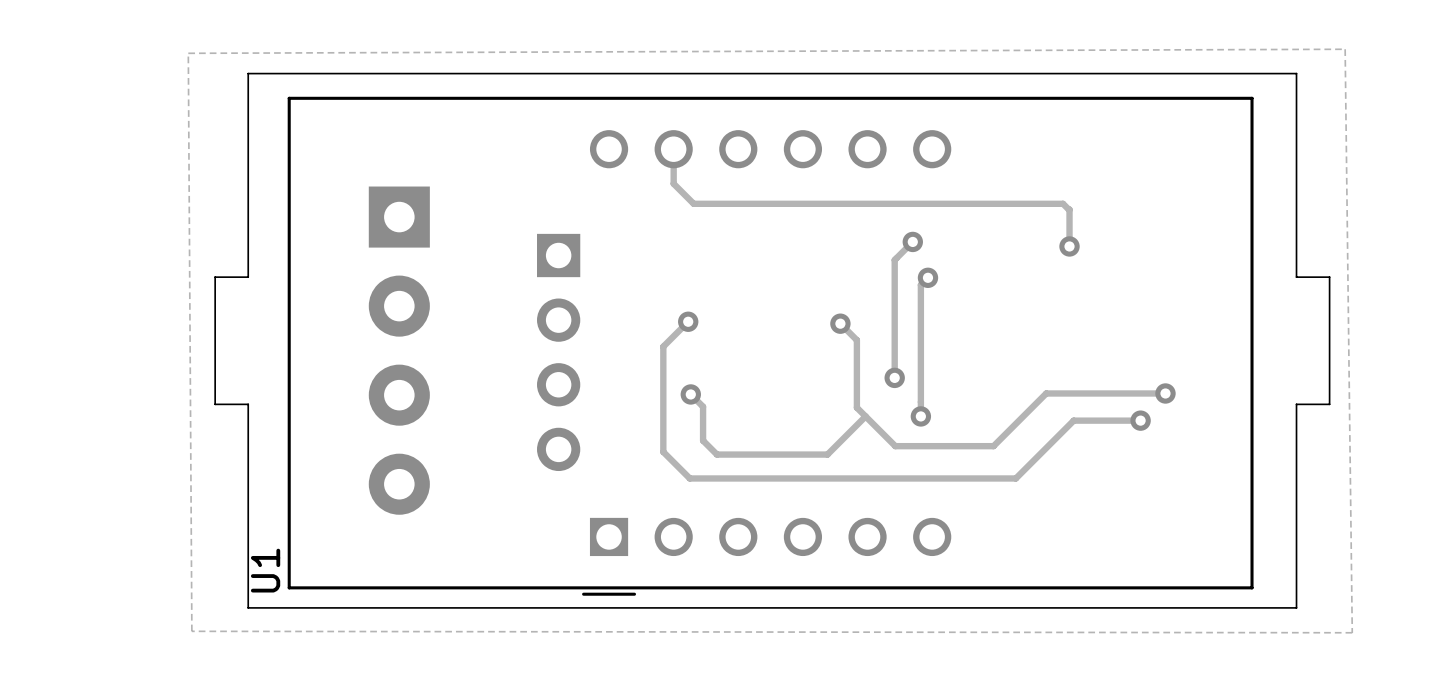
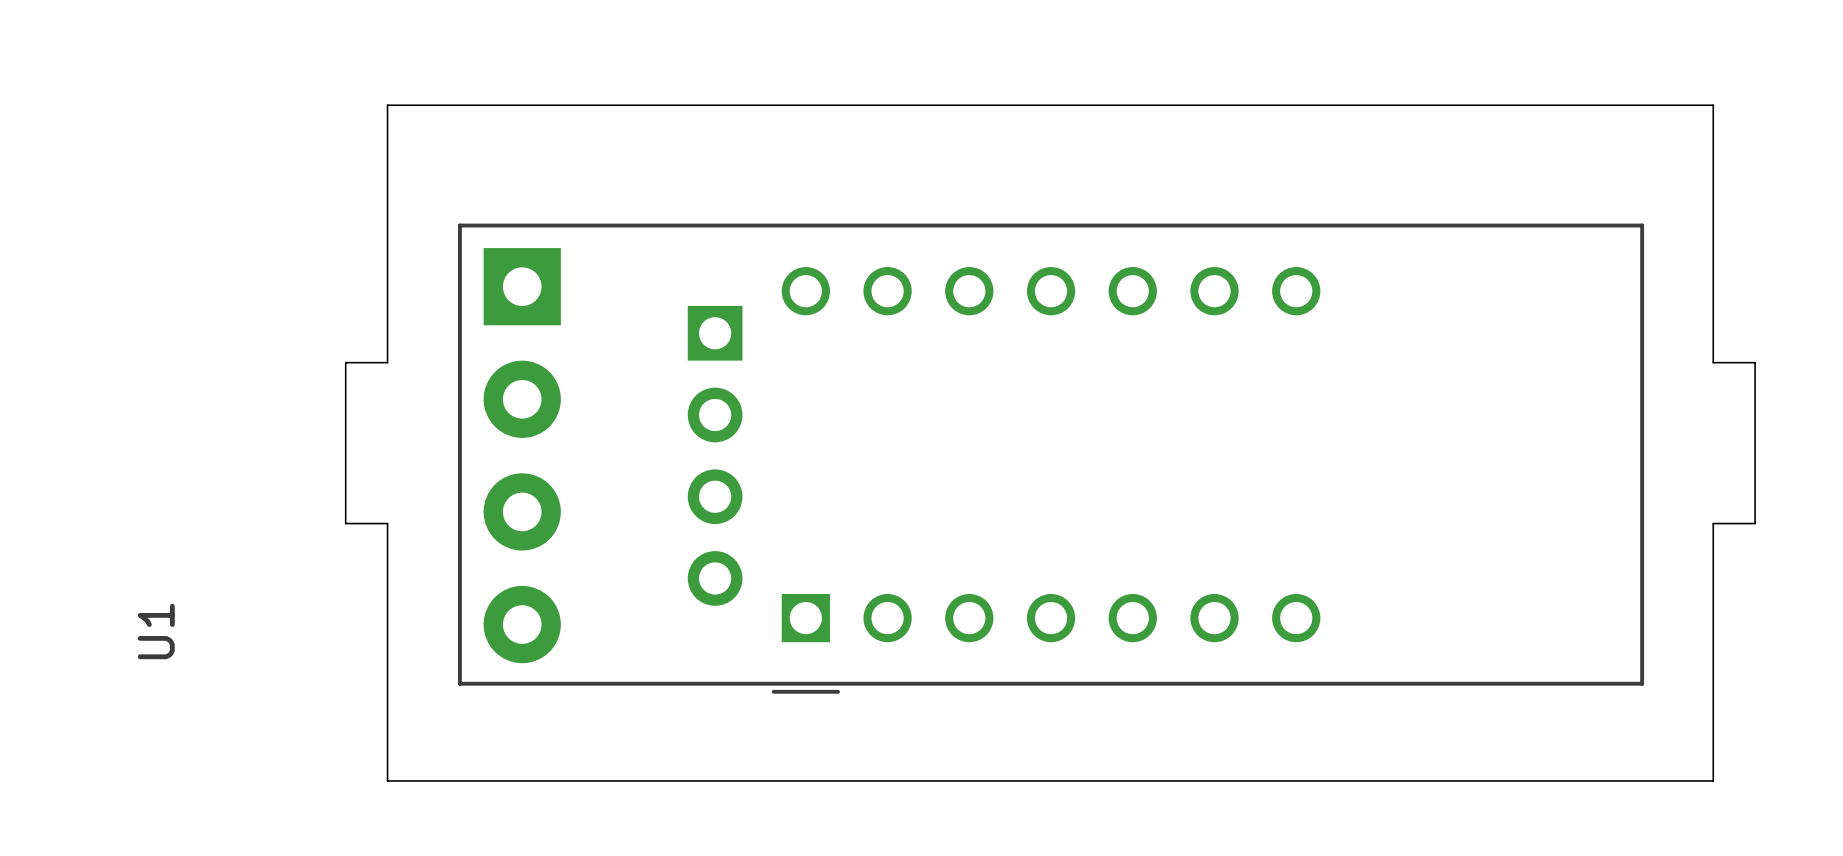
zone outline: (1345, 49) (1352, 632) (191, 631) (188, 53) (1345, 49) -> none
U1 footprint: [287, 96, 1254, 596] -> [458, 223, 1645, 694]
track: (673, 149) (673, 183) (693, 203) (1063, 203) (1069, 209) (1069, 246) -> none
track: (912, 241) (894, 260) (894, 377) -> none
via: (912, 241) -> none
via: (1069, 246) -> none
track: (927, 277) (920, 284) (920, 416) -> none
via: (927, 277) -> none
track: (688, 321) (663, 346) (663, 451) (689, 478) (1015, 478) (1073, 420) (1140, 420) -> none
via: (688, 321) -> none
track: (840, 323) (856, 340) (856, 407) (895, 446) (993, 446) (1046, 393) (1165, 393) -> none
via: (840, 323) -> none
part position: (399, 350) -> (522, 455)
part position: (558, 352) -> (715, 455)
via: (894, 377) -> none
via: (1165, 393) -> none
track: (690, 394) (703, 406) (703, 440) (716, 454) (827, 454) (865, 416) -> none
via: (690, 394) -> none
via: (920, 416) -> none
via: (1140, 420) -> none
U1 name position: U1 (265, 570) -> U1 (156, 631)

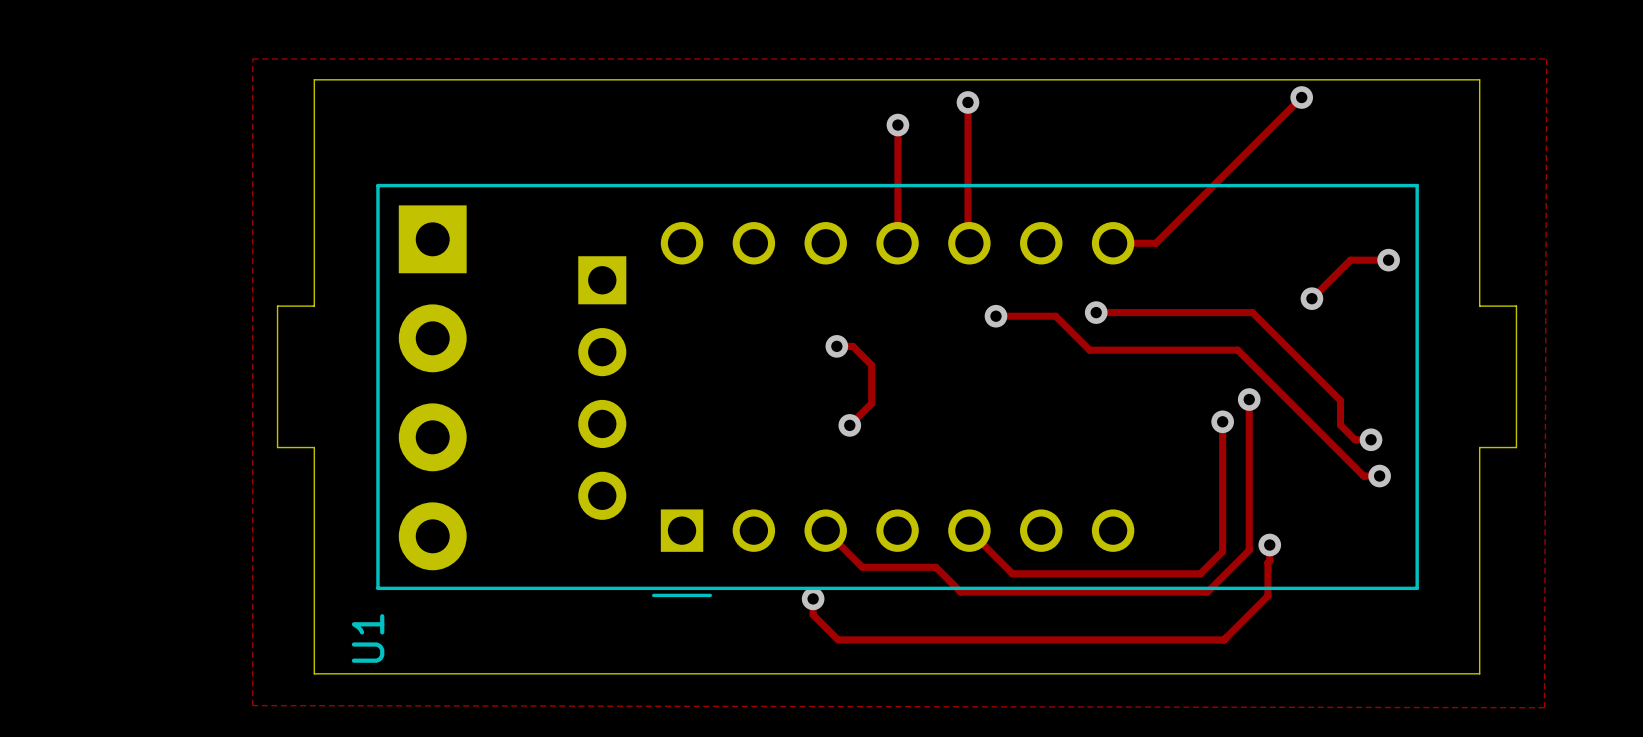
zone outline: none -> (252, 58) (252, 705) (1544, 707) (1546, 58) (252, 58)
track: none -> (1301, 97) (1155, 243) (1113, 243)
via: none -> (1301, 97)
track: none -> (967, 102) (969, 243)
via: none -> (967, 102)
track: none -> (897, 125) (897, 242)
via: none -> (897, 125)
track: none -> (1388, 260) (1350, 260) (1311, 298)
via: none -> (1388, 260)
via: none -> (1311, 298)
track: none -> (1096, 312) (1252, 312) (1340, 400) (1340, 425) (1355, 439) (1371, 439)
via: none -> (1096, 312)
track: none -> (995, 316) (1055, 316) (1089, 350) (1237, 350) (1363, 476) (1379, 476)
via: none -> (995, 316)
track: none -> (836, 346) (852, 346) (871, 365) (871, 403) (849, 425)
via: none -> (836, 346)
track: none -> (1249, 399) (1249, 550) (1207, 592) (960, 592) (936, 567) (862, 567) (825, 530)
via: none -> (1249, 399)
track: none -> (1222, 421) (1222, 551) (1200, 573) (1012, 573) (969, 530)
via: none -> (1222, 421)
via: none -> (849, 425)
via: none -> (1371, 439)
via: none -> (1379, 476)
U1 name position: U1 (156, 631) -> U1 (368, 638)
track: none -> (1269, 545) (1267, 596) (1223, 640)
via: none -> (1269, 545)
track: none -> (813, 598) (813, 614) (838, 639) (1224, 639)
via: none -> (813, 598)

